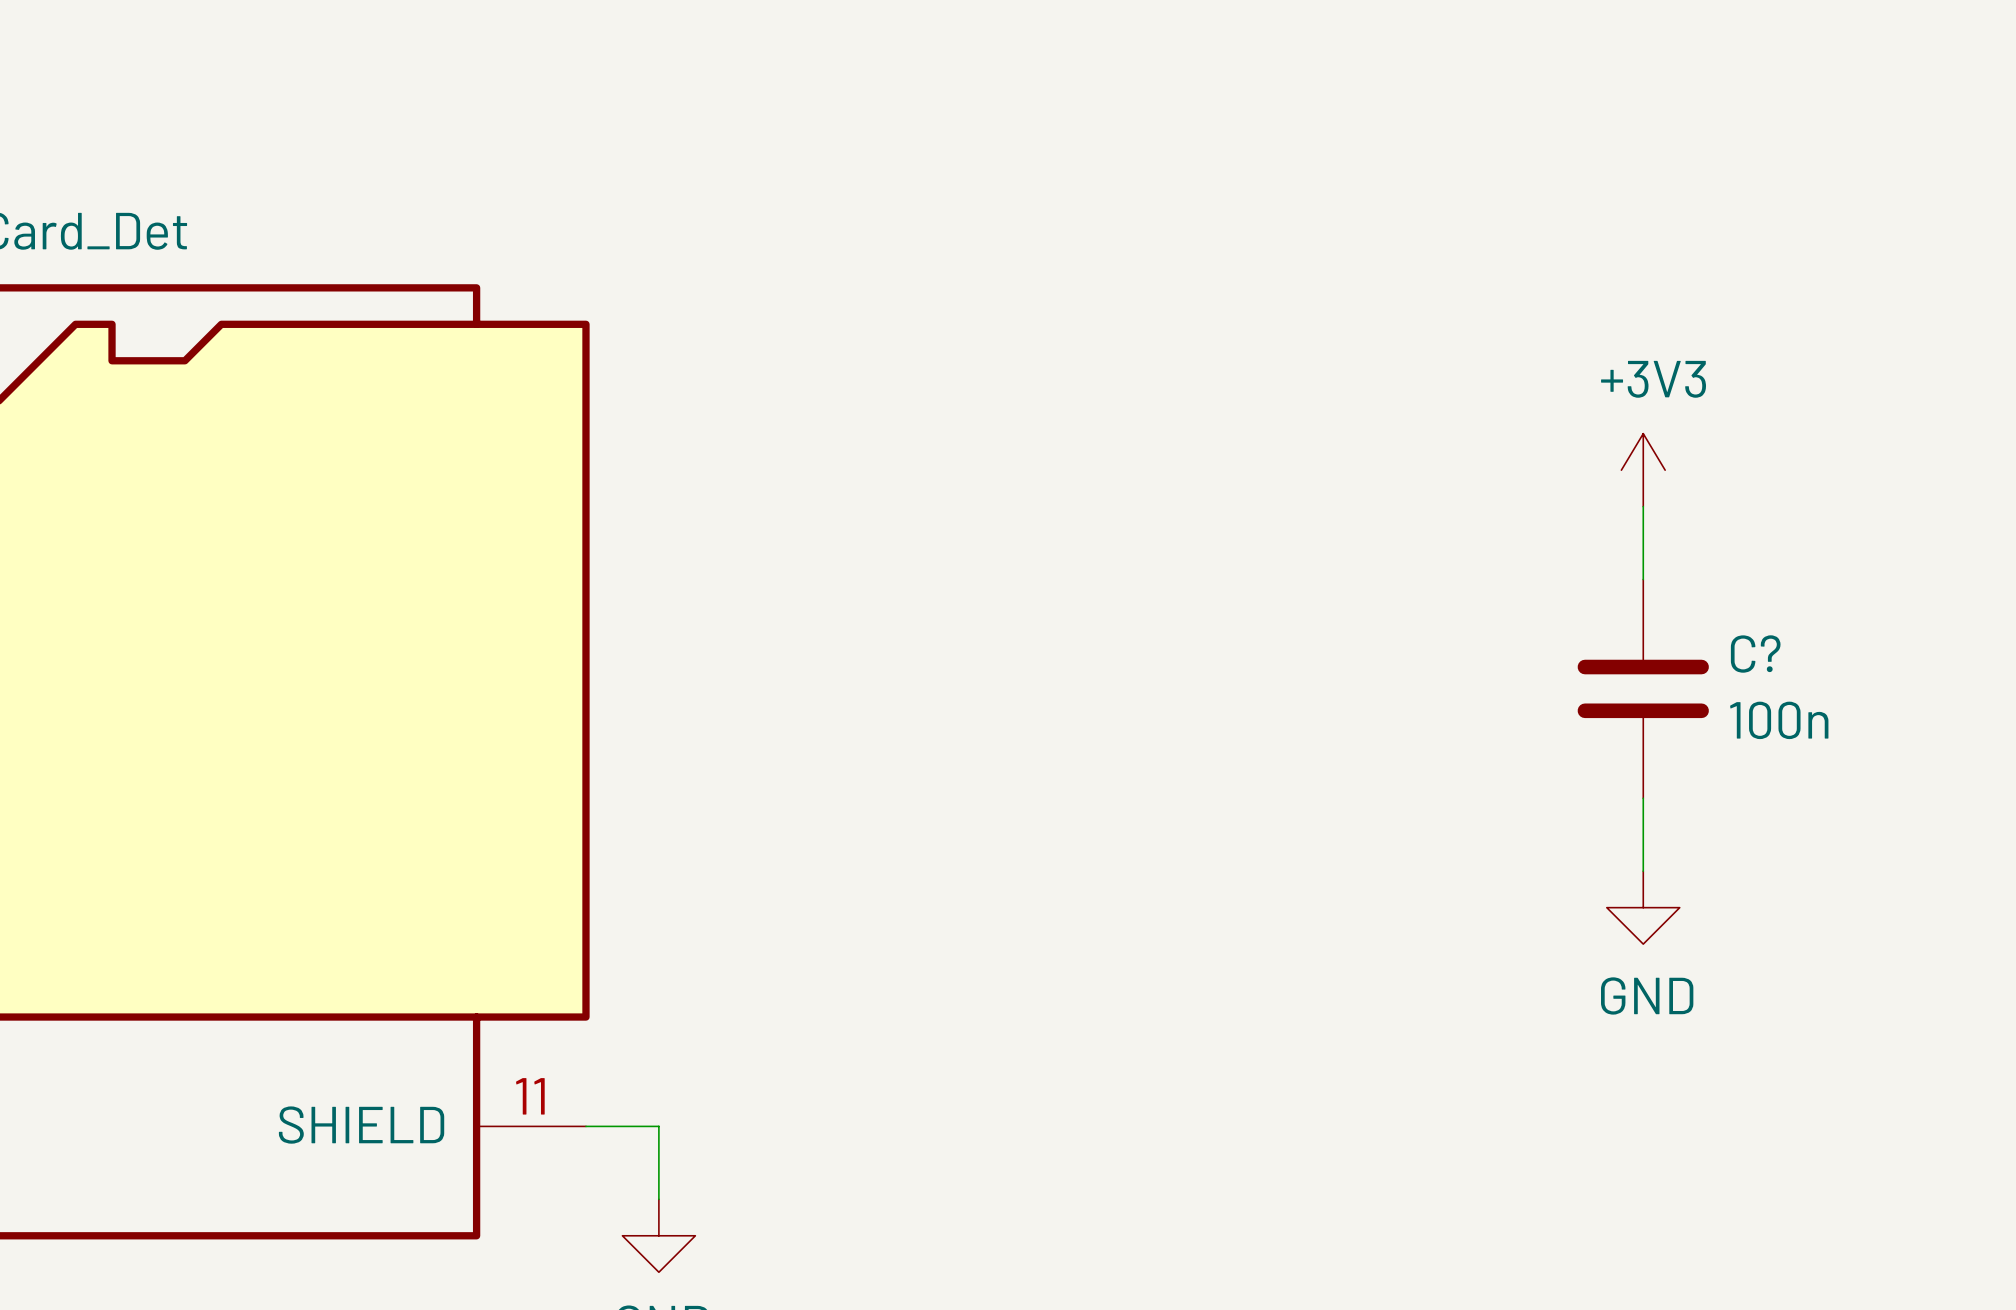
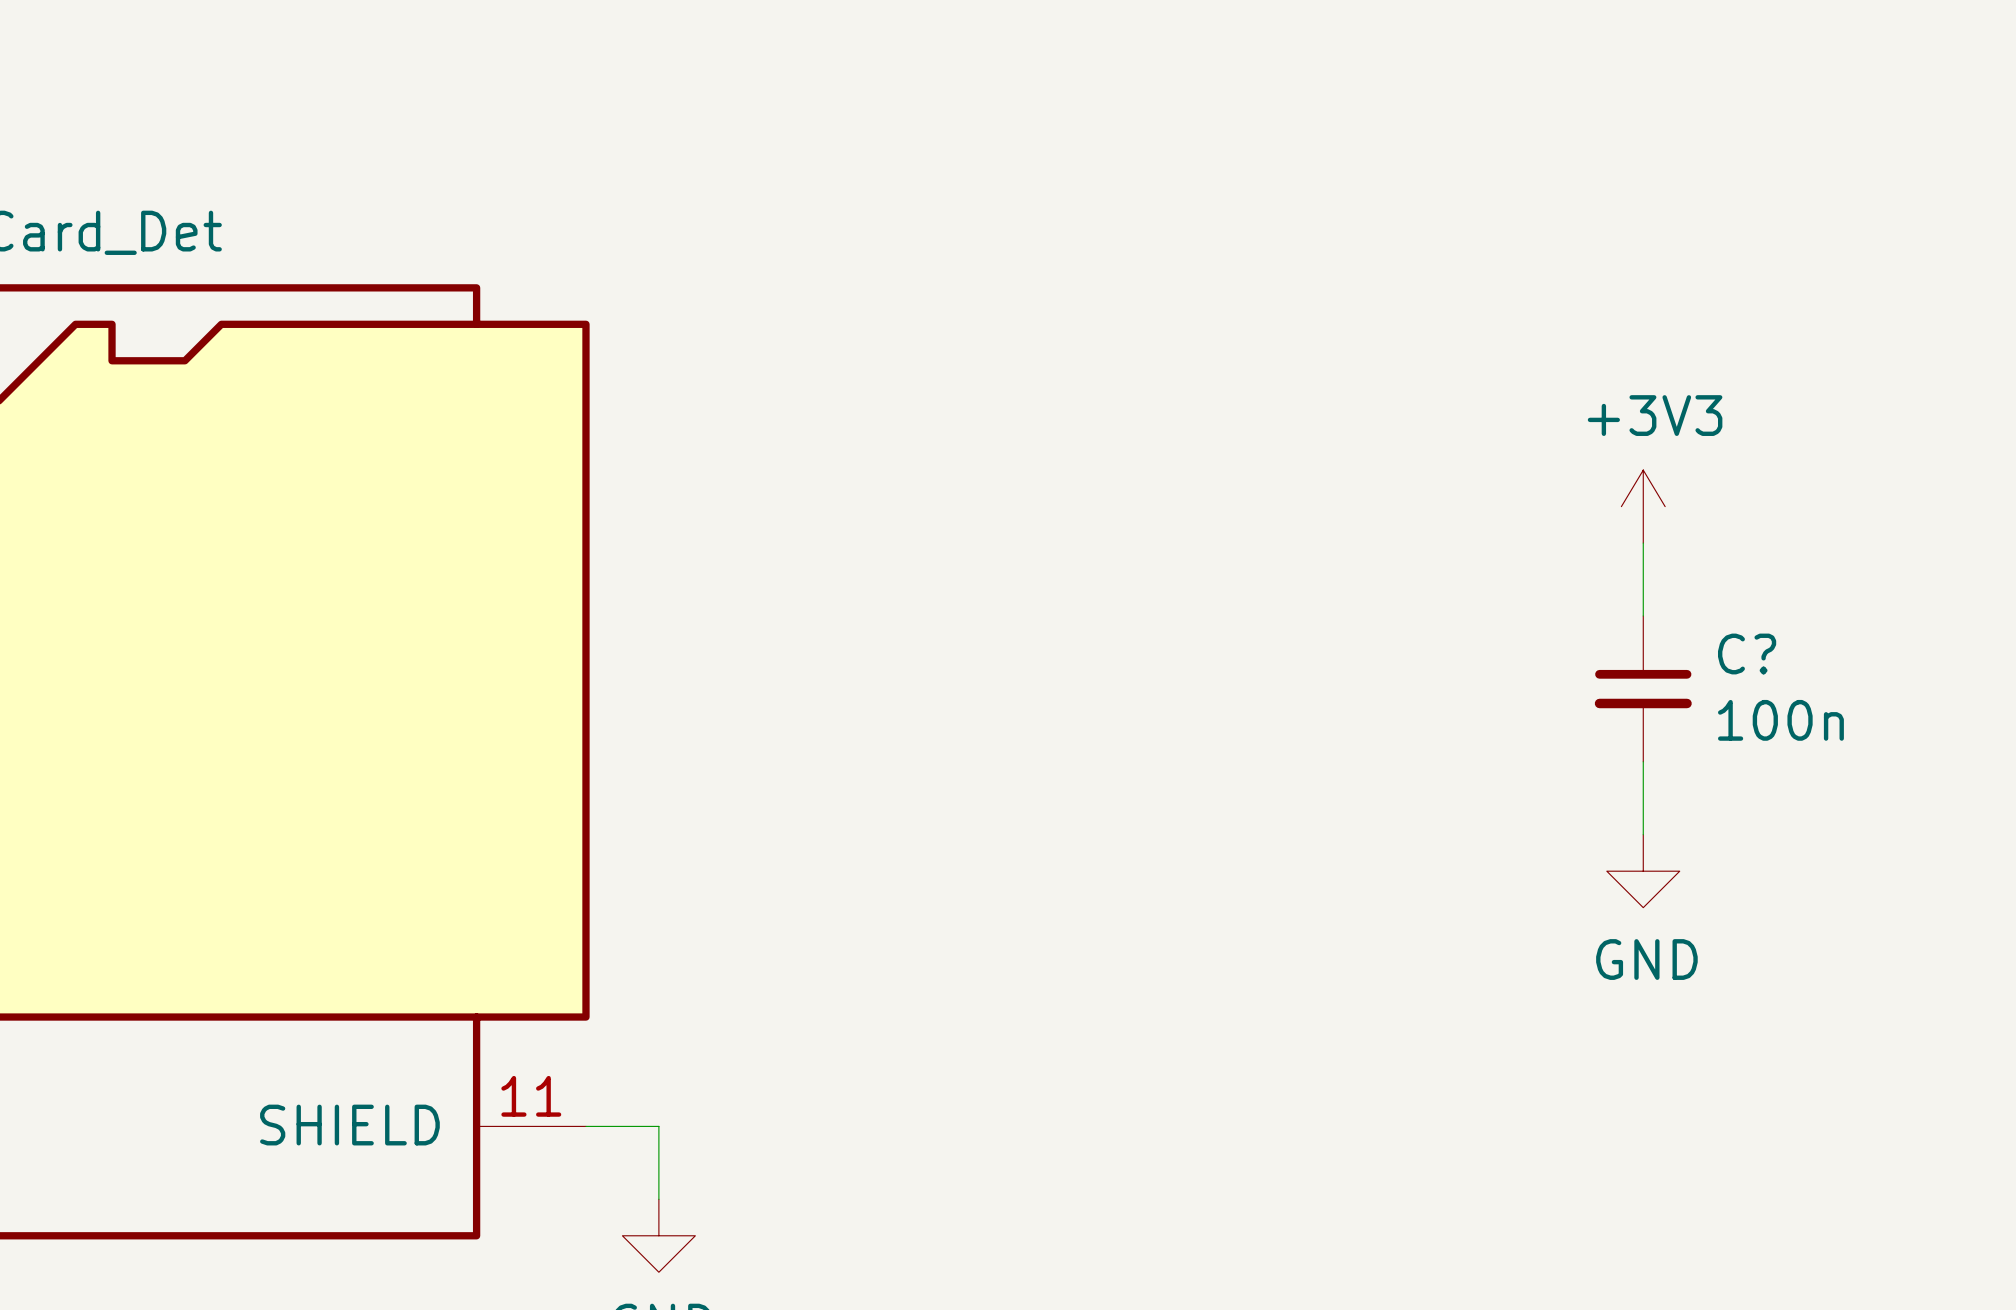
power symbol position: +3V3 (1643, 470) -> +3V3 (1643, 506)
C? symbol: [1577, 579, 1709, 799] -> [1594, 615, 1692, 762]
power symbol position: GND (1643, 907) -> GND (1643, 871)

